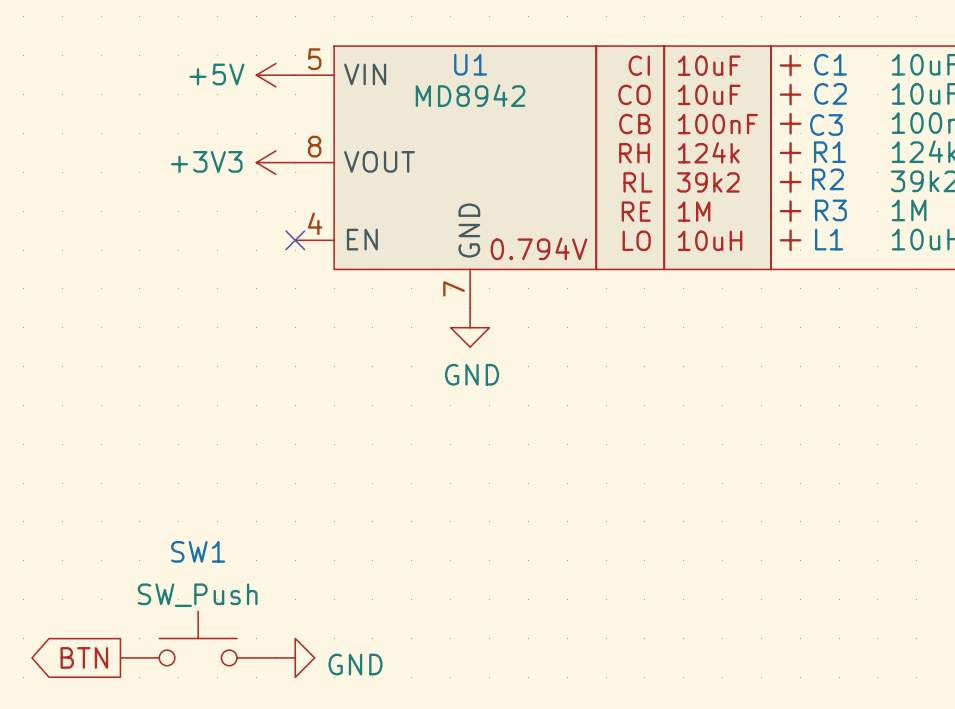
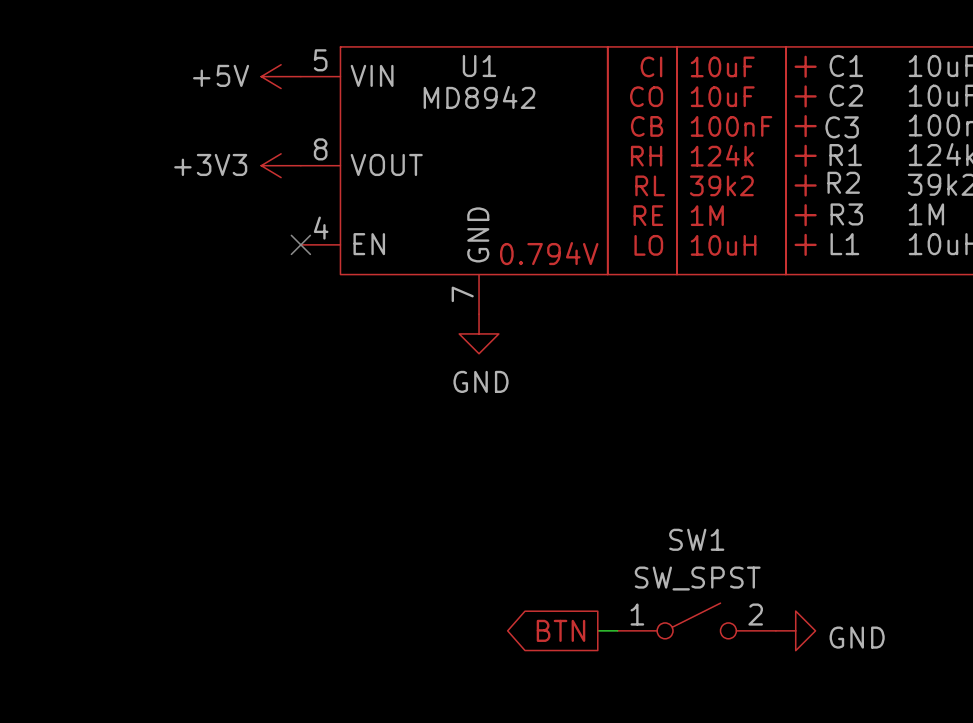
SW1 value: SW_Push (197, 595) -> SW_SPST (697, 578)
SW1 symbol: [120, 611, 276, 666] -> [617, 603, 776, 639]
global label: none -> BTN (561, 630)
wire: none -> (597, 630) (617, 630)
power symbol: none -> GND (795, 630)
global label: BTN (84, 657) -> none
power symbol: GND (295, 657) -> none

